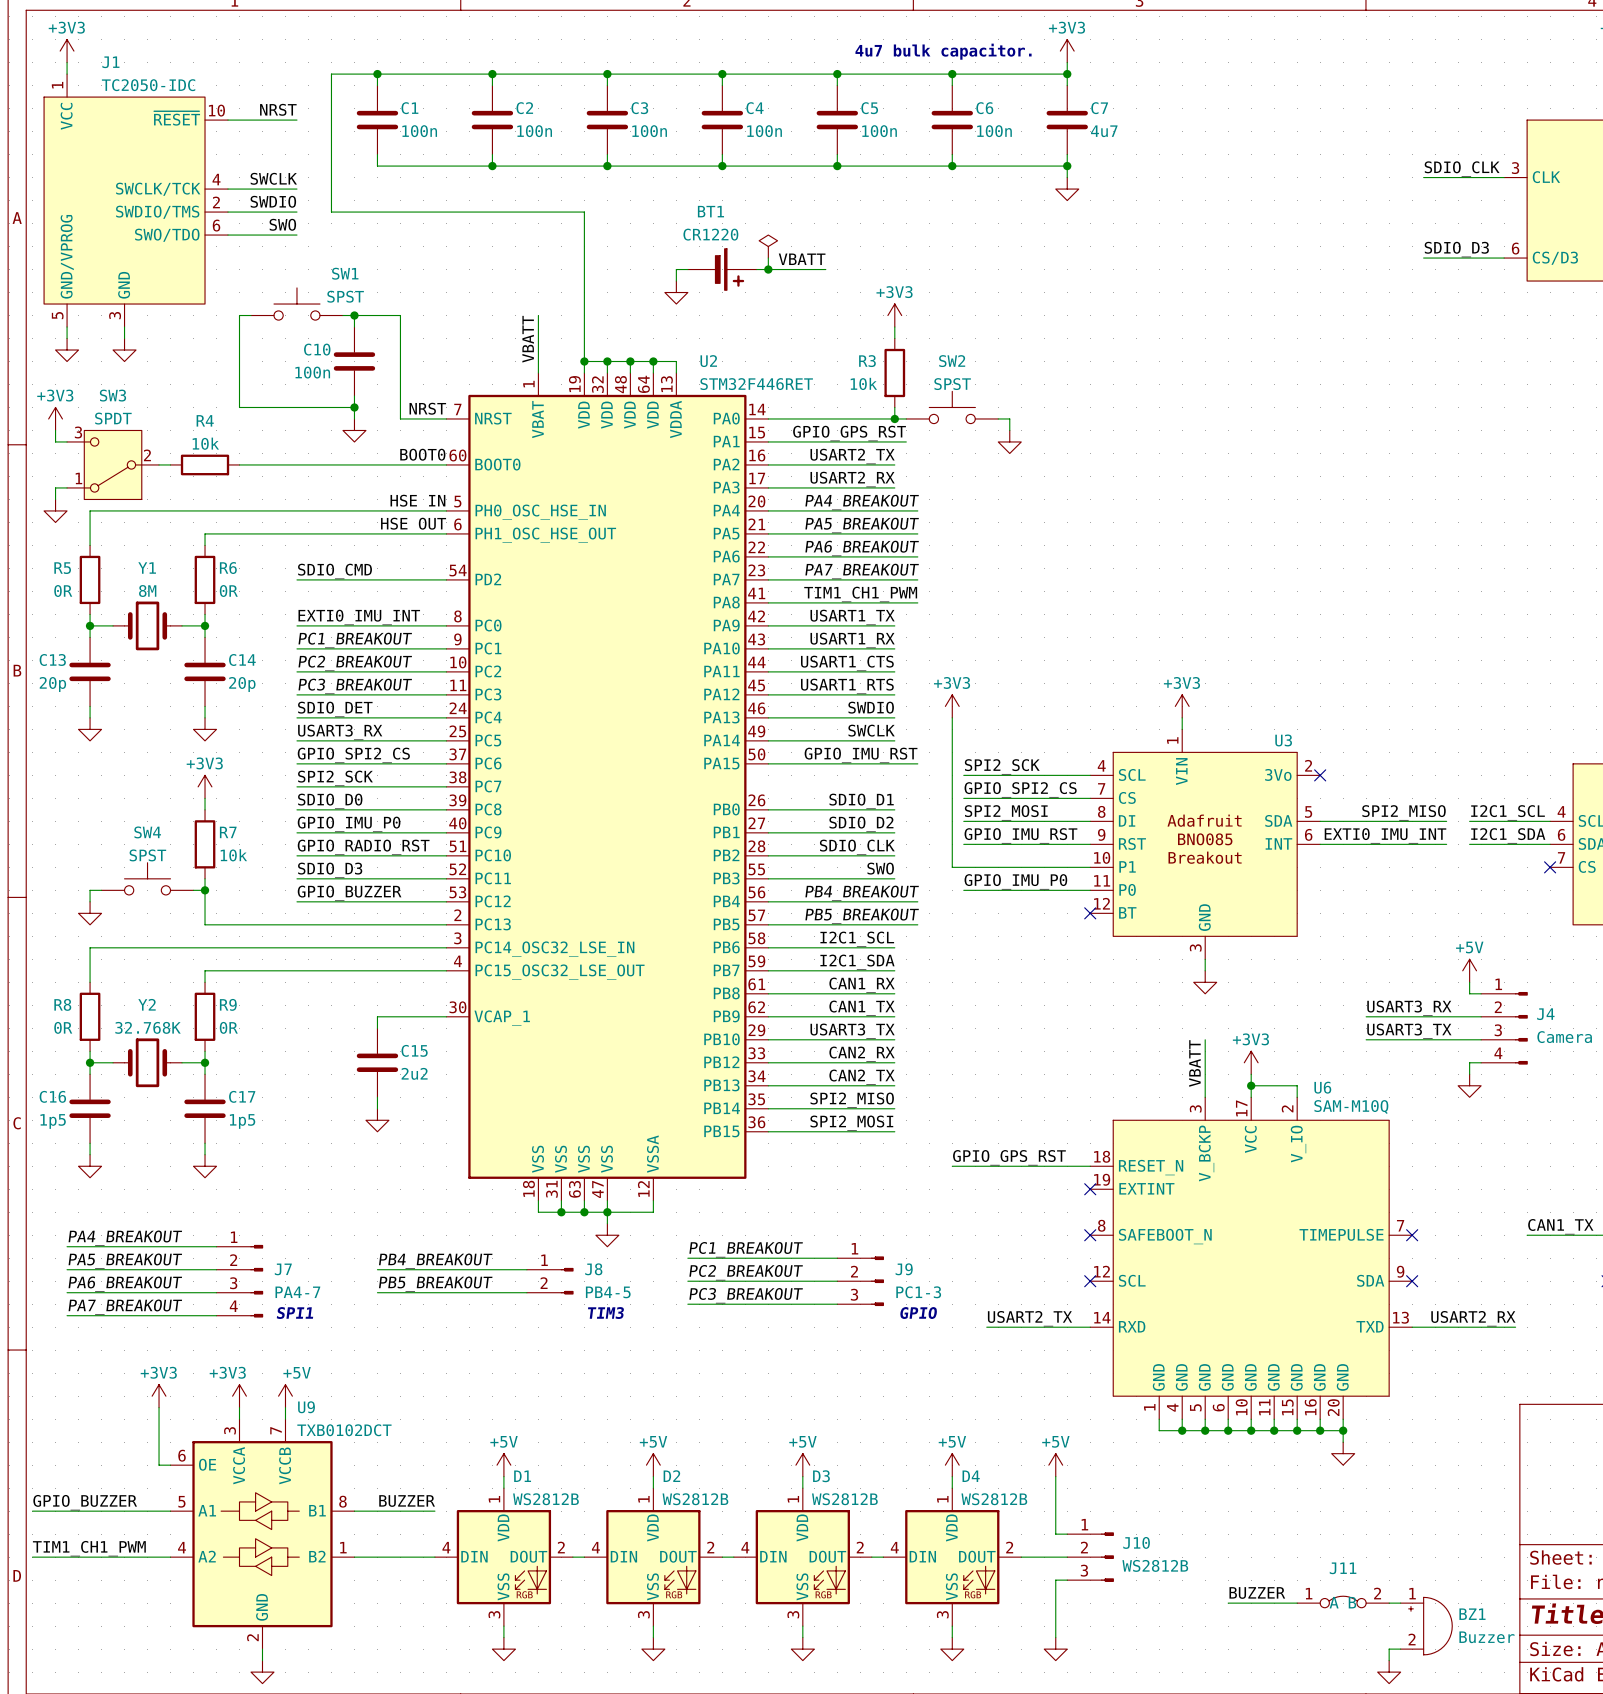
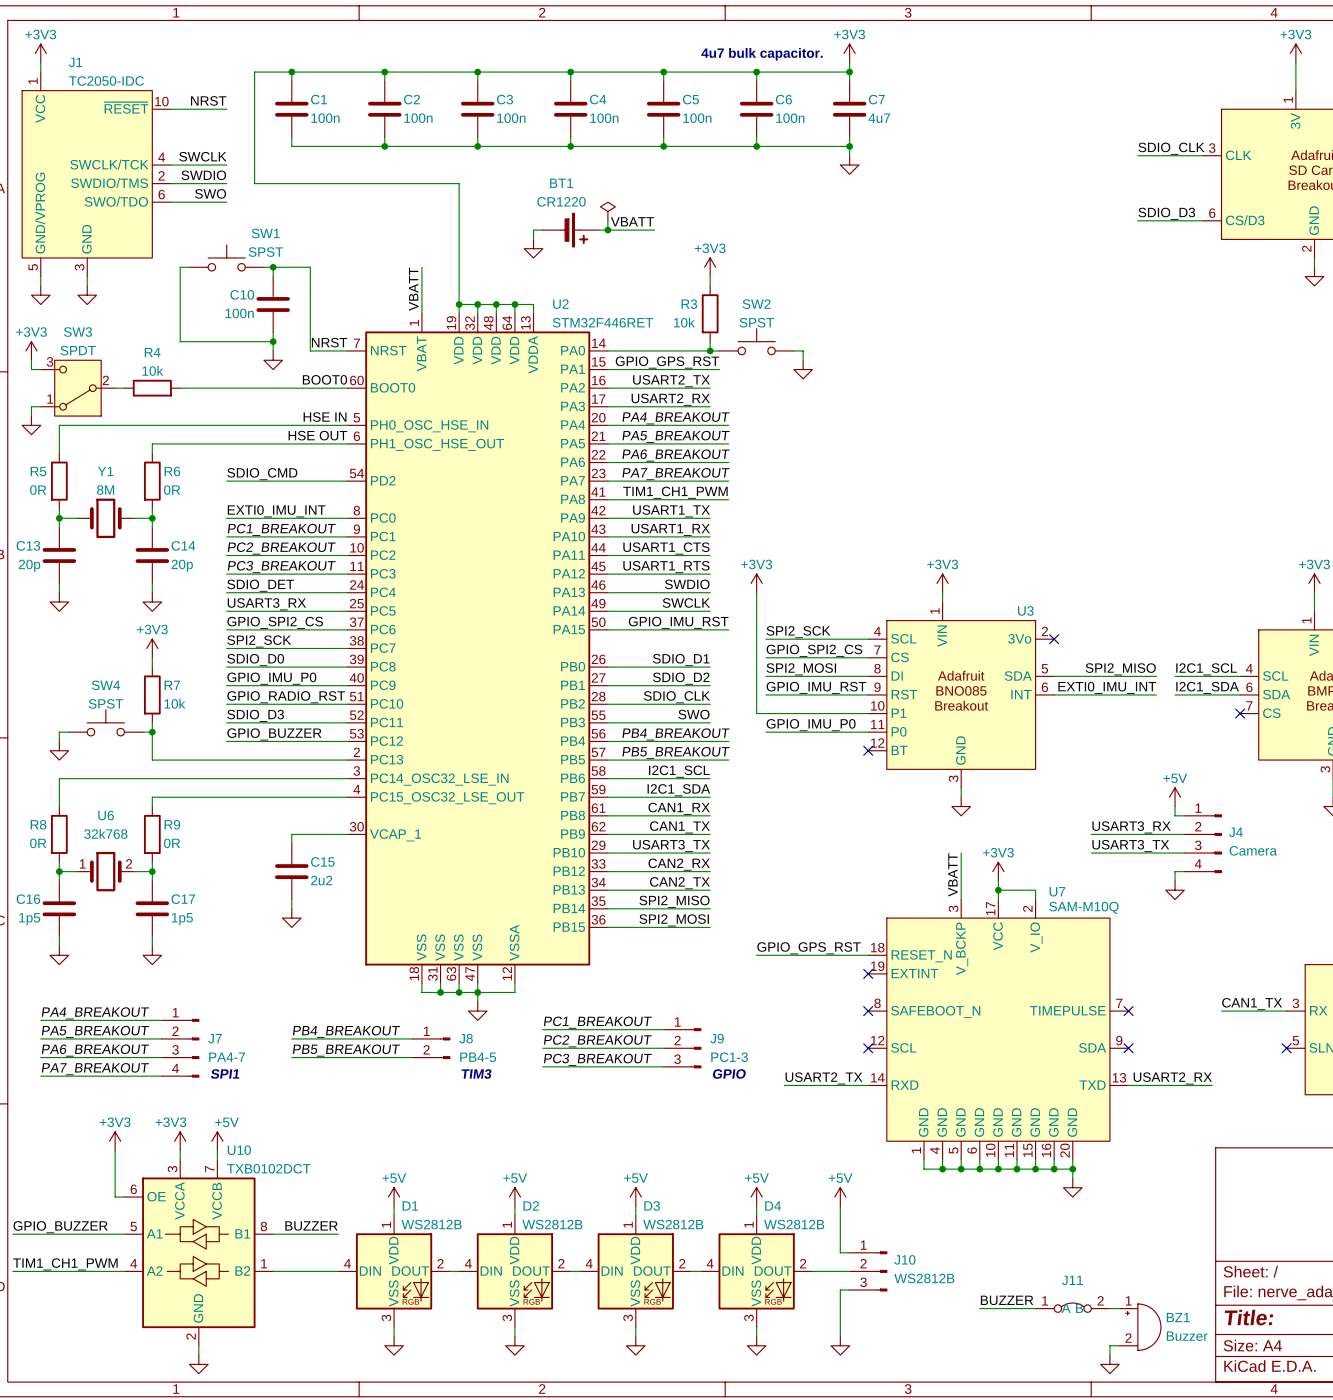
Y2 name: Y2 (147, 1004) -> U6 (106, 815)
Y2 value: 32.768K (148, 1027) -> 32k768 (105, 833)
Y2 pin number: none -> 1 (82, 863)
Y2 pin number: none -> 2 (129, 863)
U6 name: U6 (1322, 1087) -> U7 (1057, 891)
U9 name: U9 (306, 1407) -> U10 (239, 1150)

